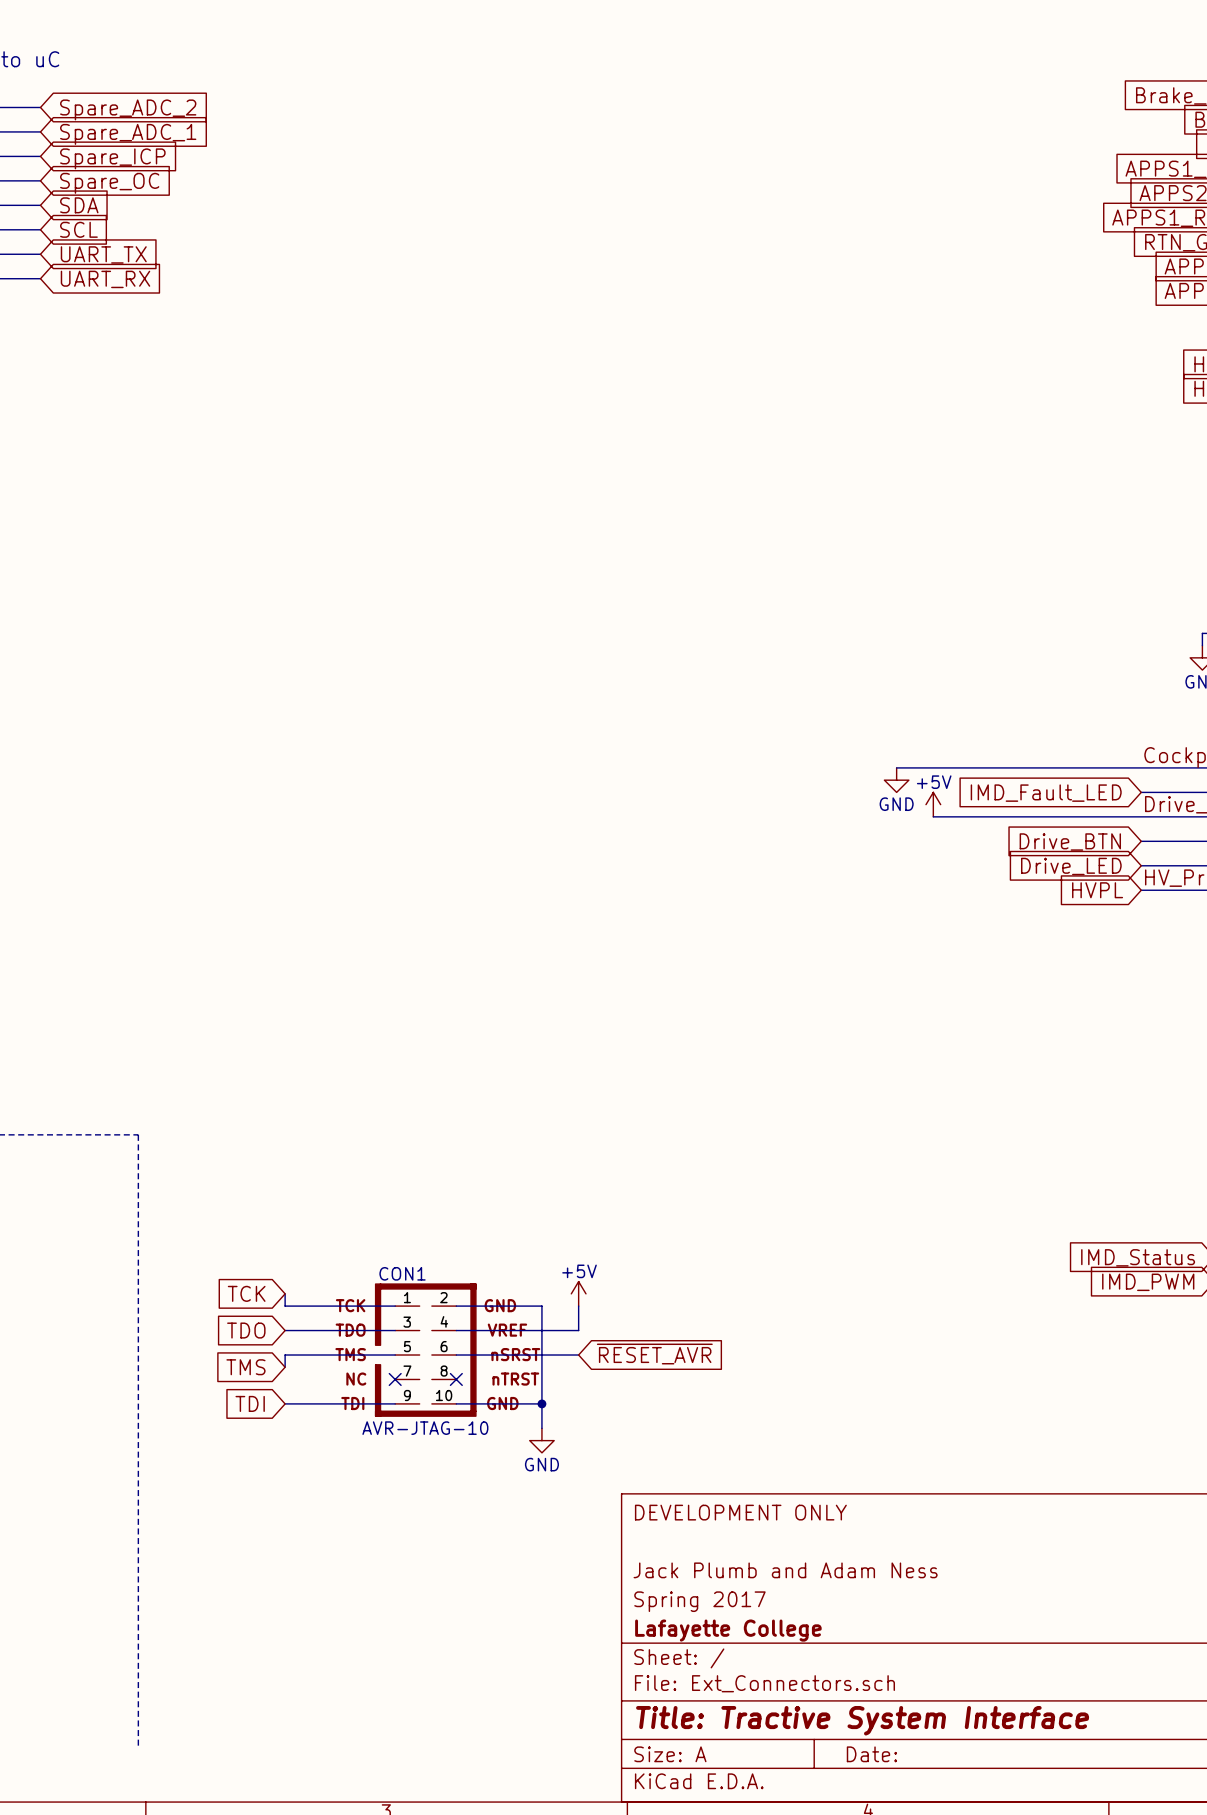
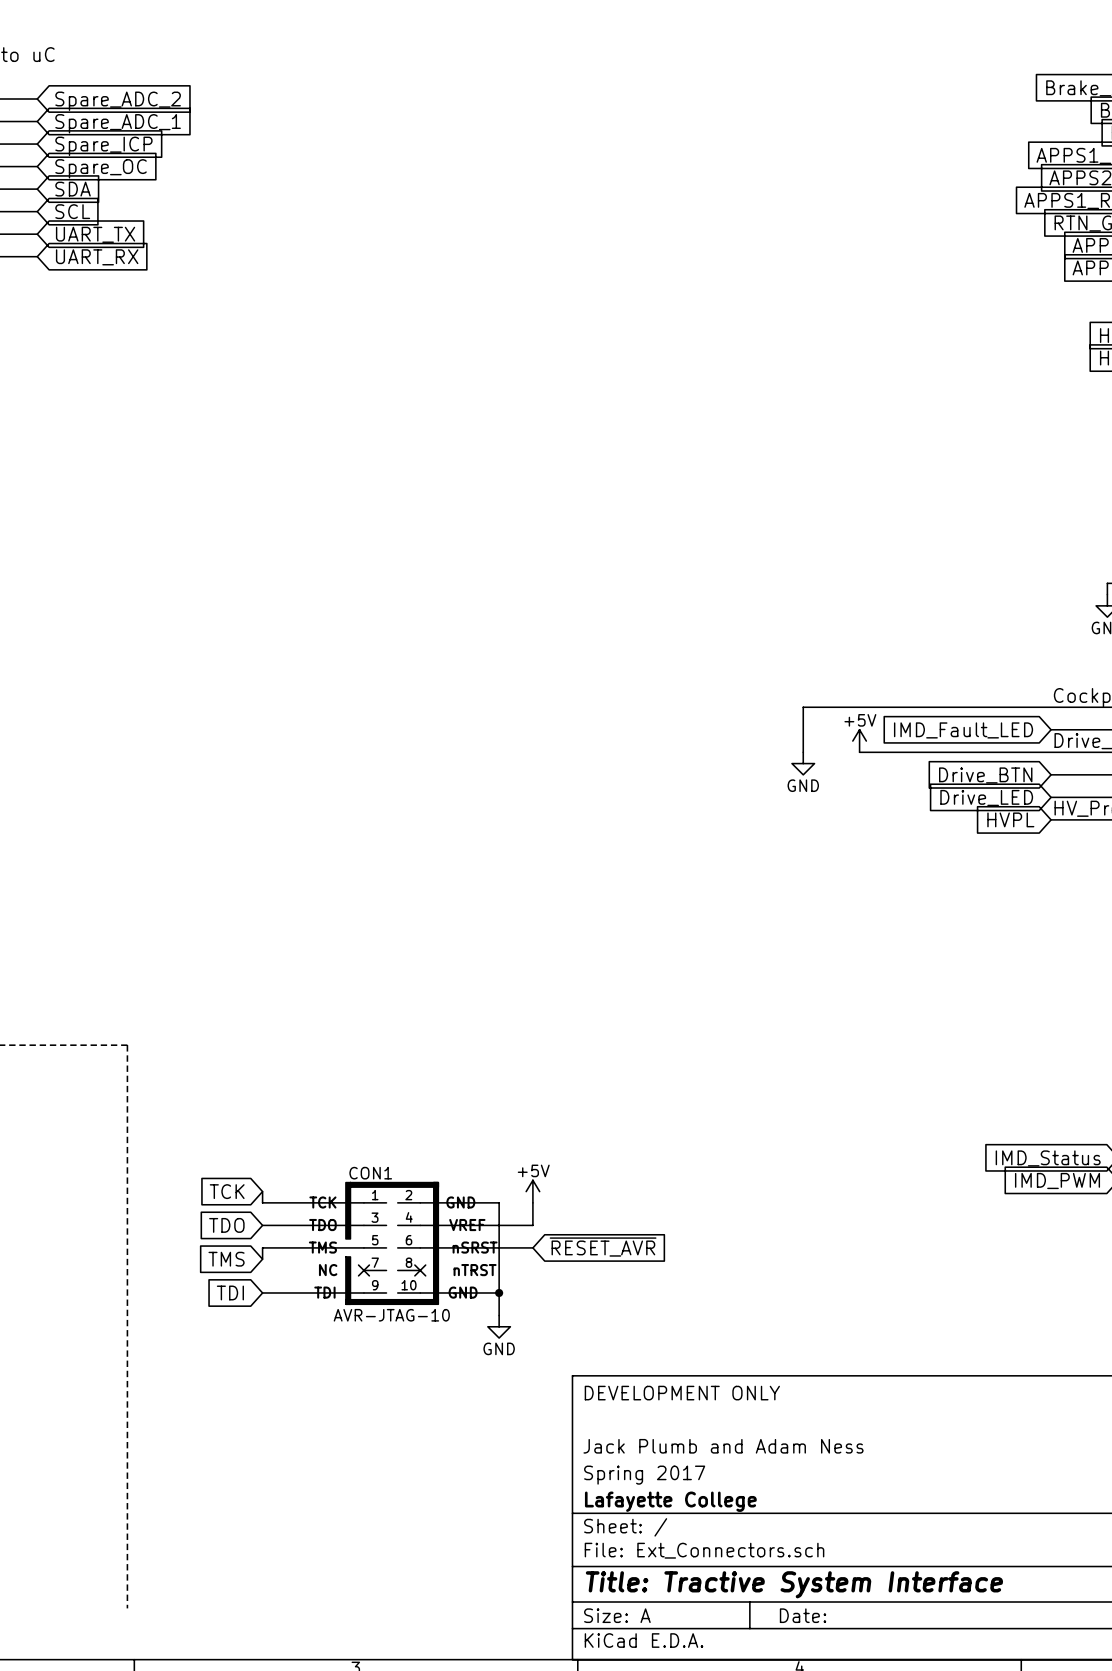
wire: none -> (825, 707) (803, 707) (803, 752)
power symbol position: GND (896, 780) -> GND (803, 763)

